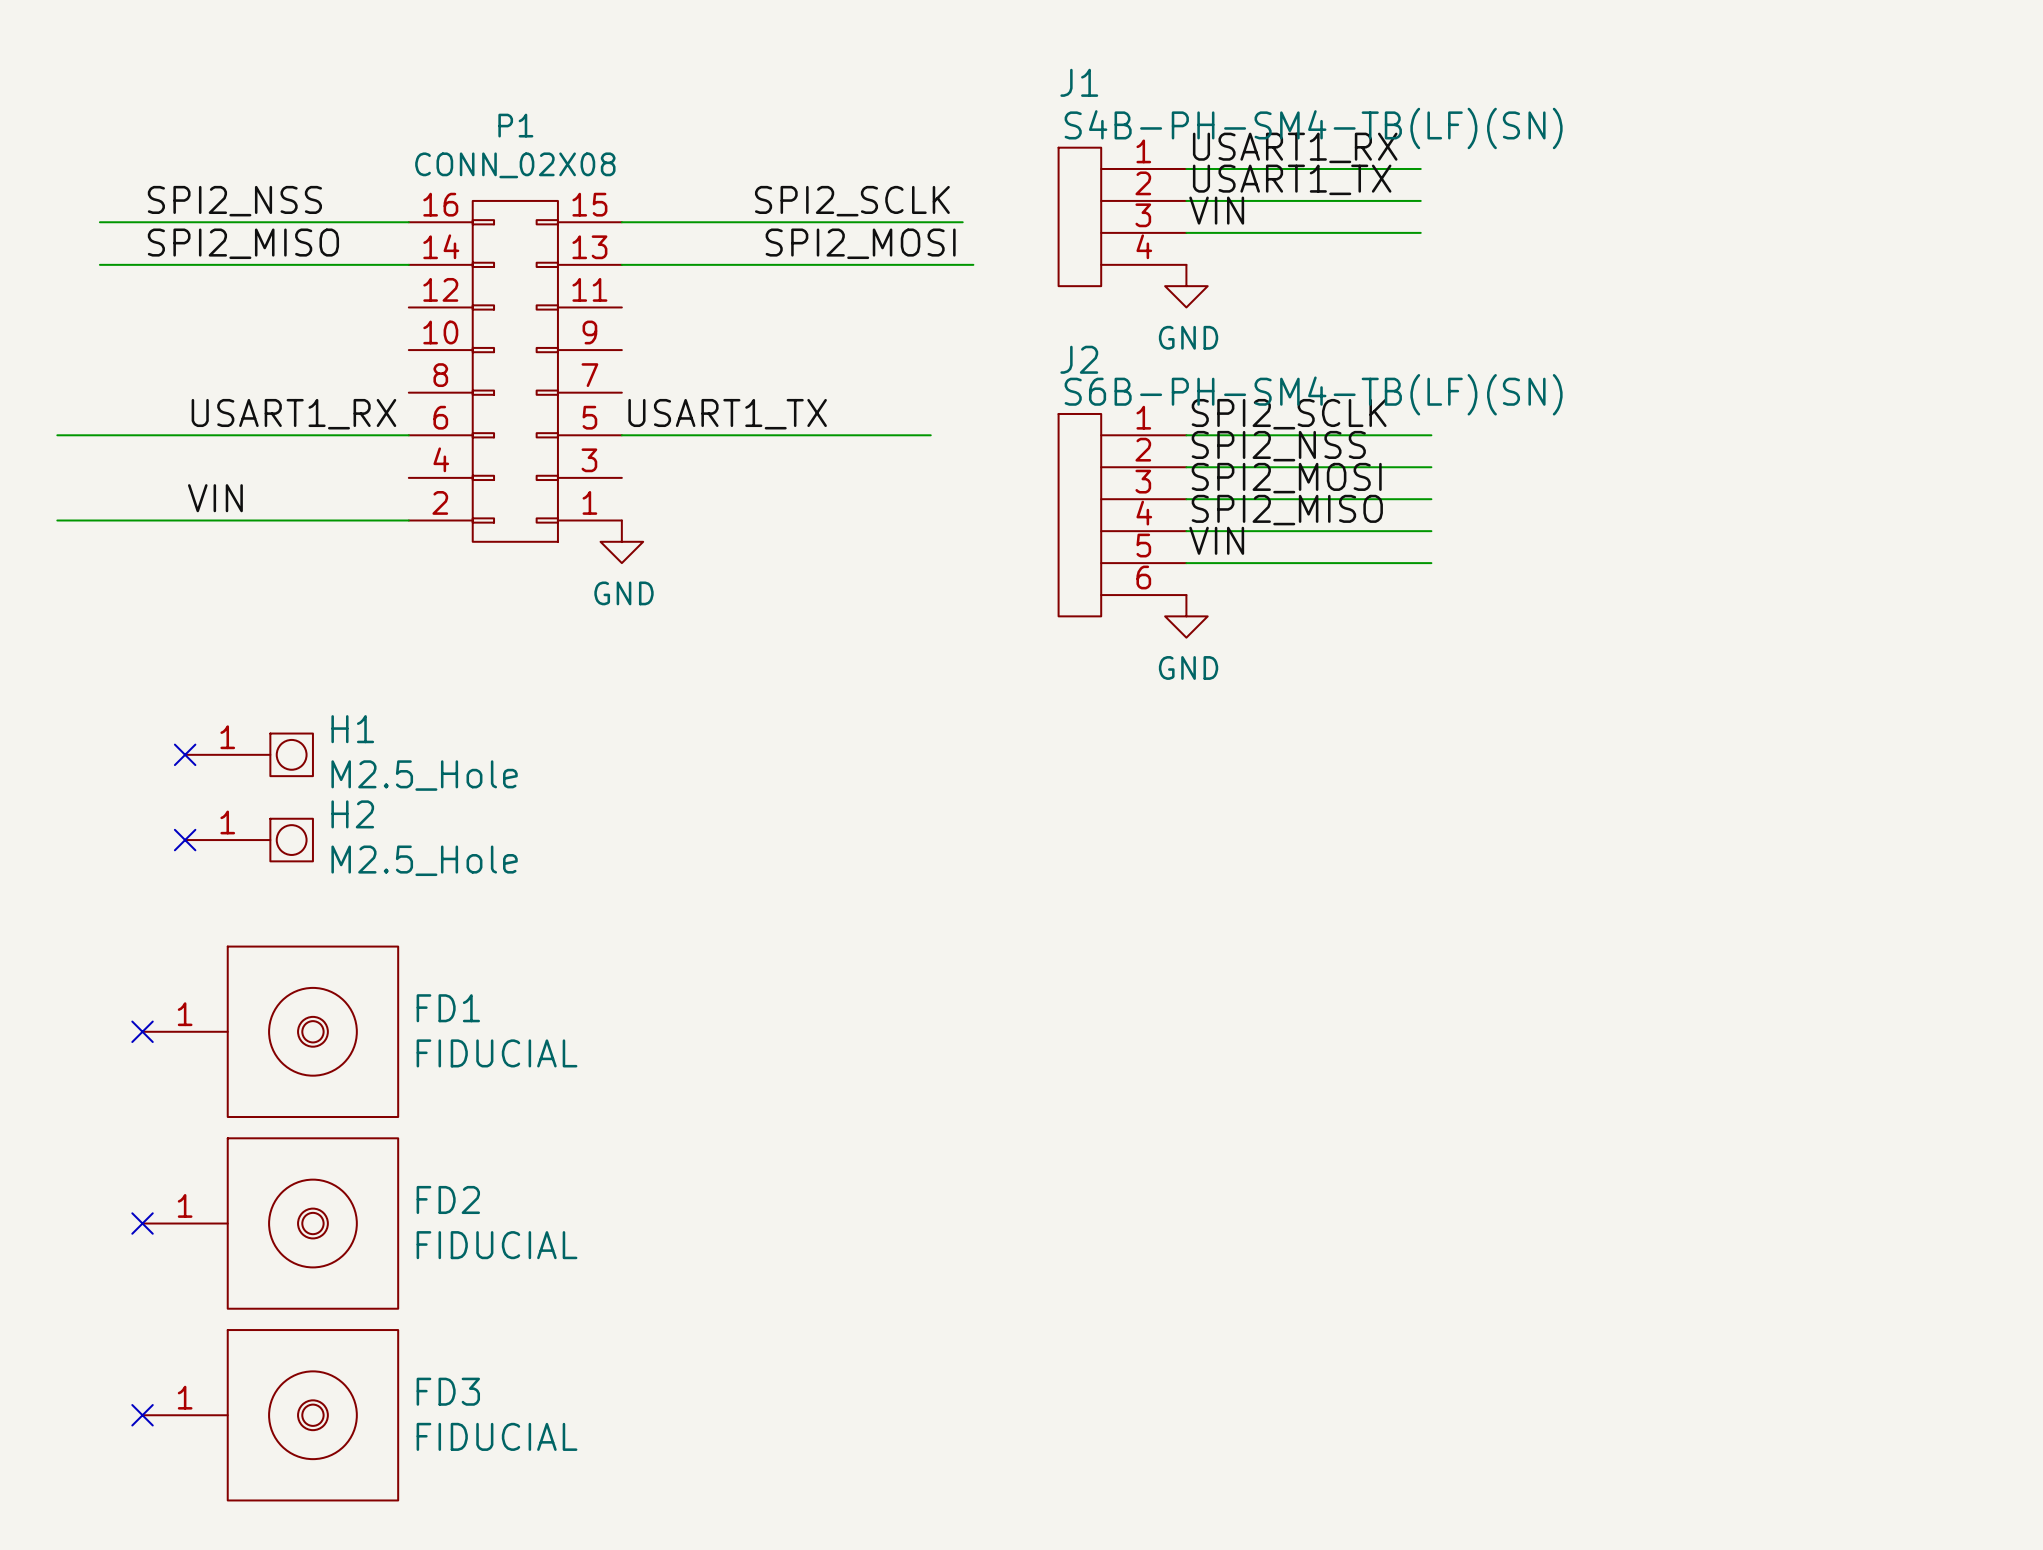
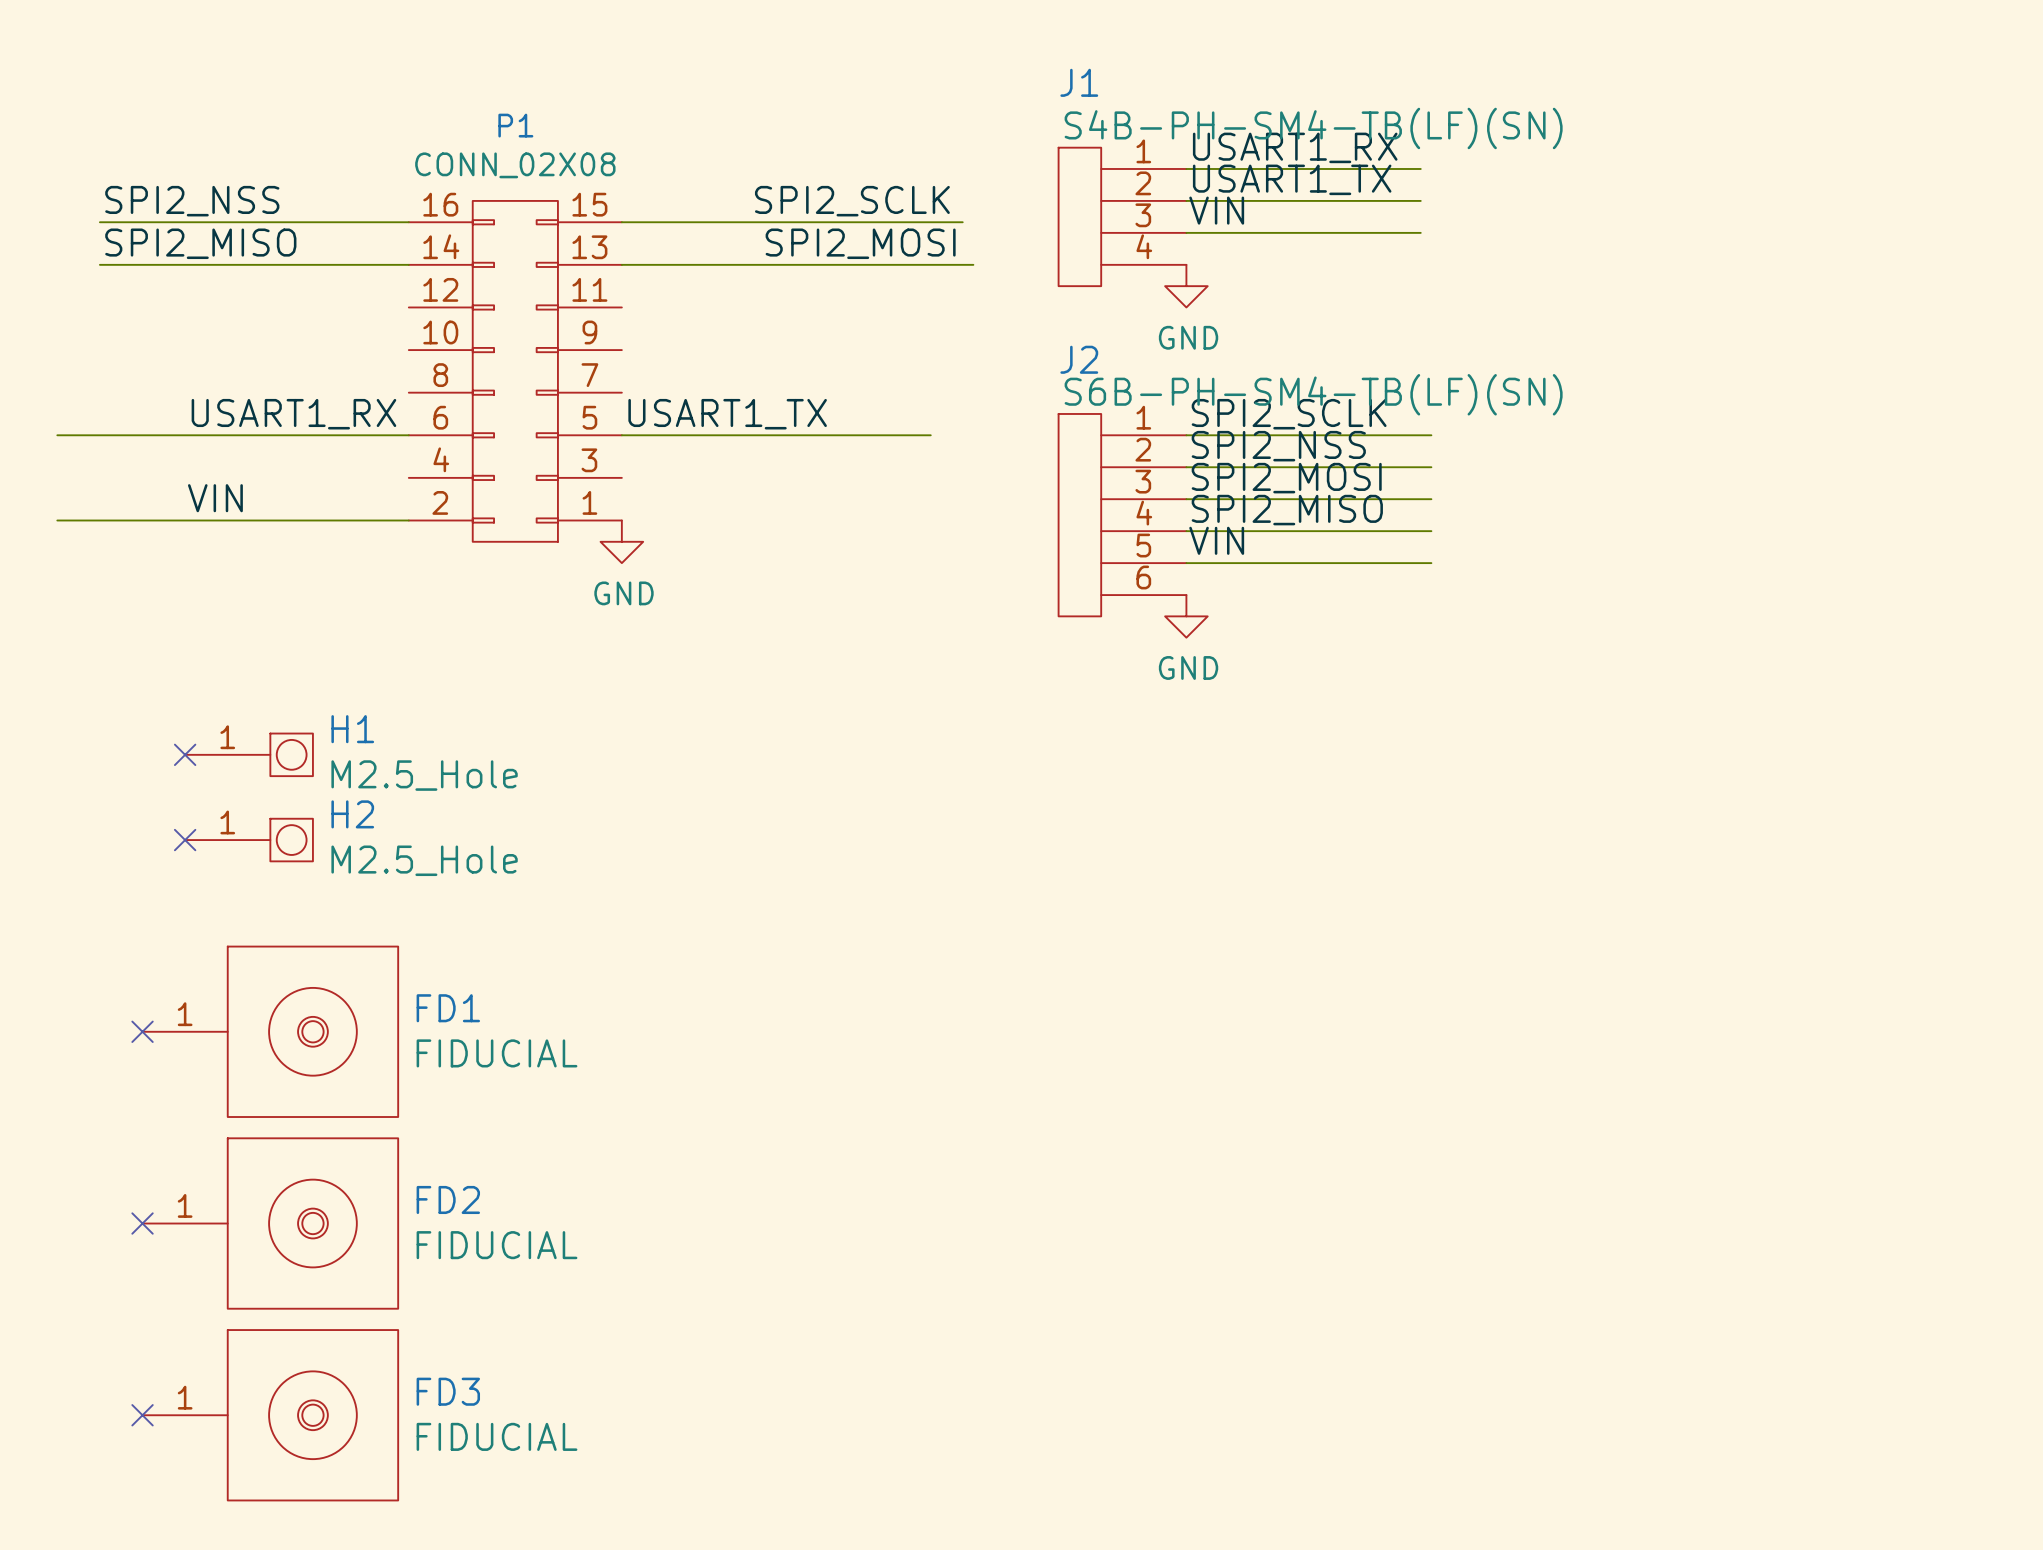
label position: SPI2_NSS (234, 201) -> SPI2_NSS (192, 201)
label position: SPI2_MISO (243, 243) -> SPI2_MISO (200, 243)

